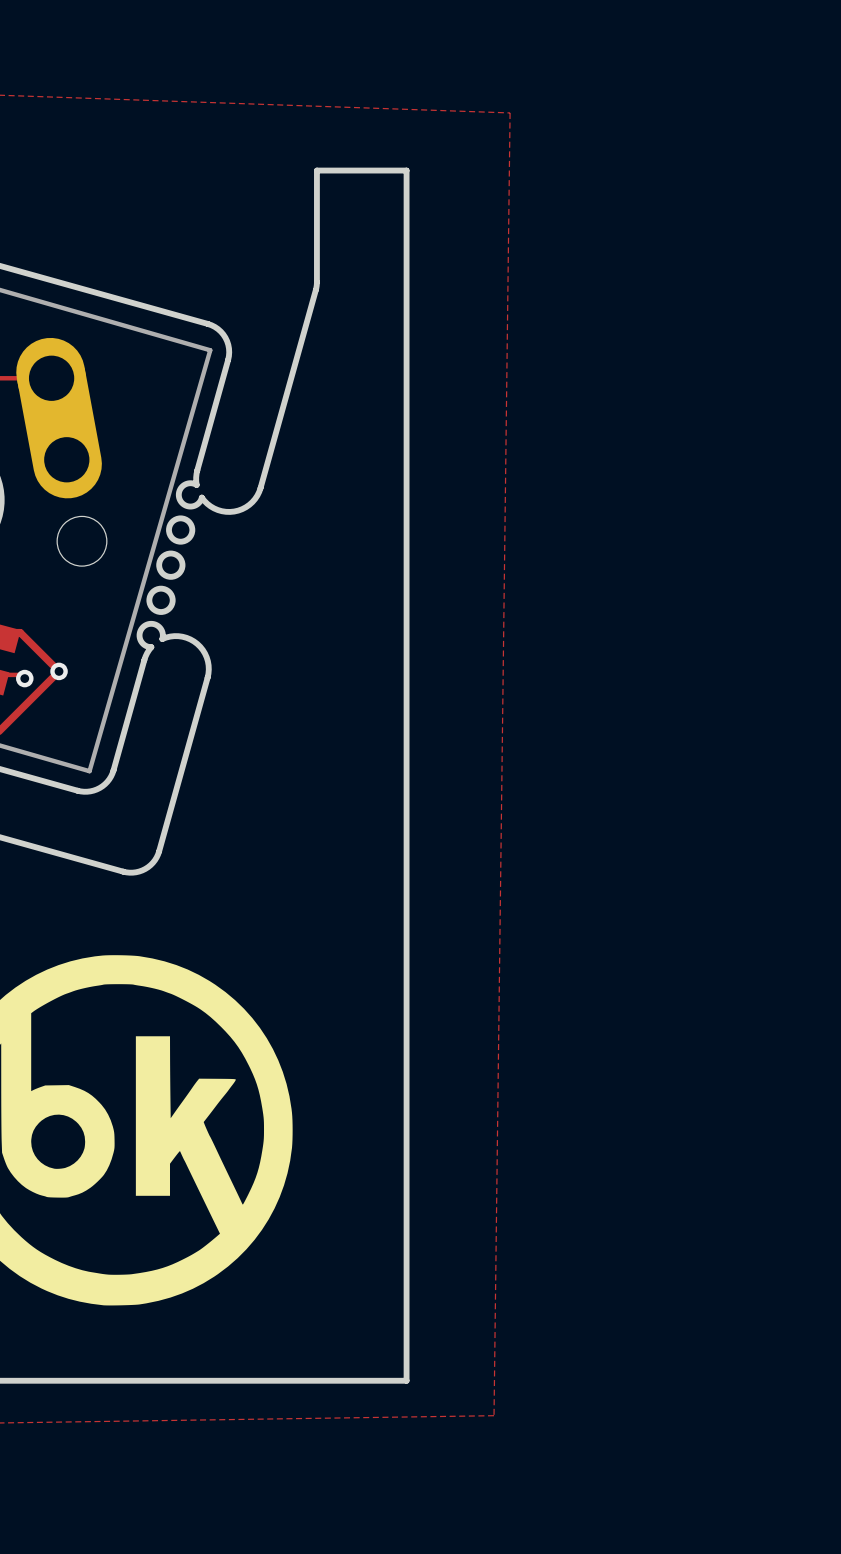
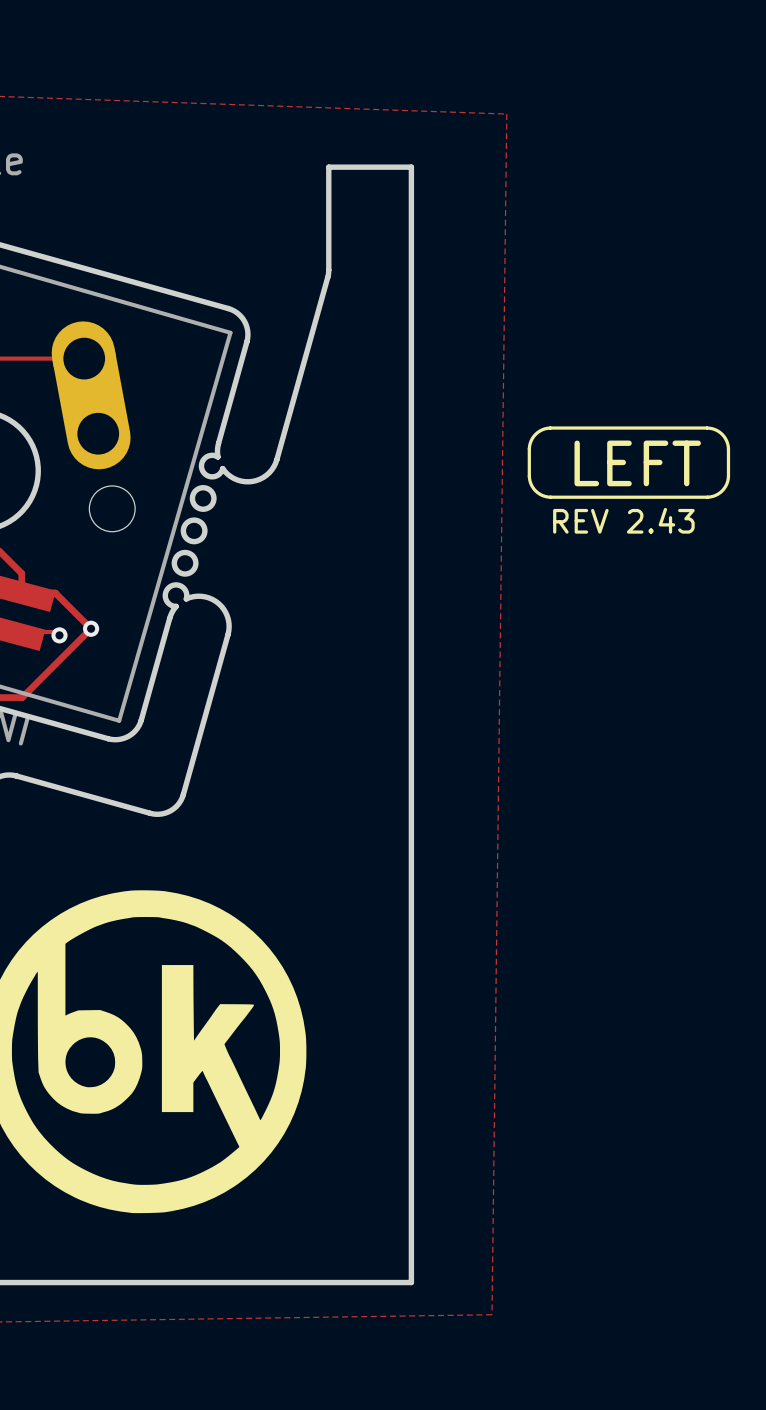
line: none -> (550, 428) (712, 428) (722, 434) (727, 443) (727, 481) (720, 492) (707, 497) (545, 496) (535, 491) (530, 481) (529, 448) (531, 440) (535, 434) (542, 429) (550, 428)
text: none -> LEFT (637, 463)
text: none -> REV 2.43 (623, 520)

